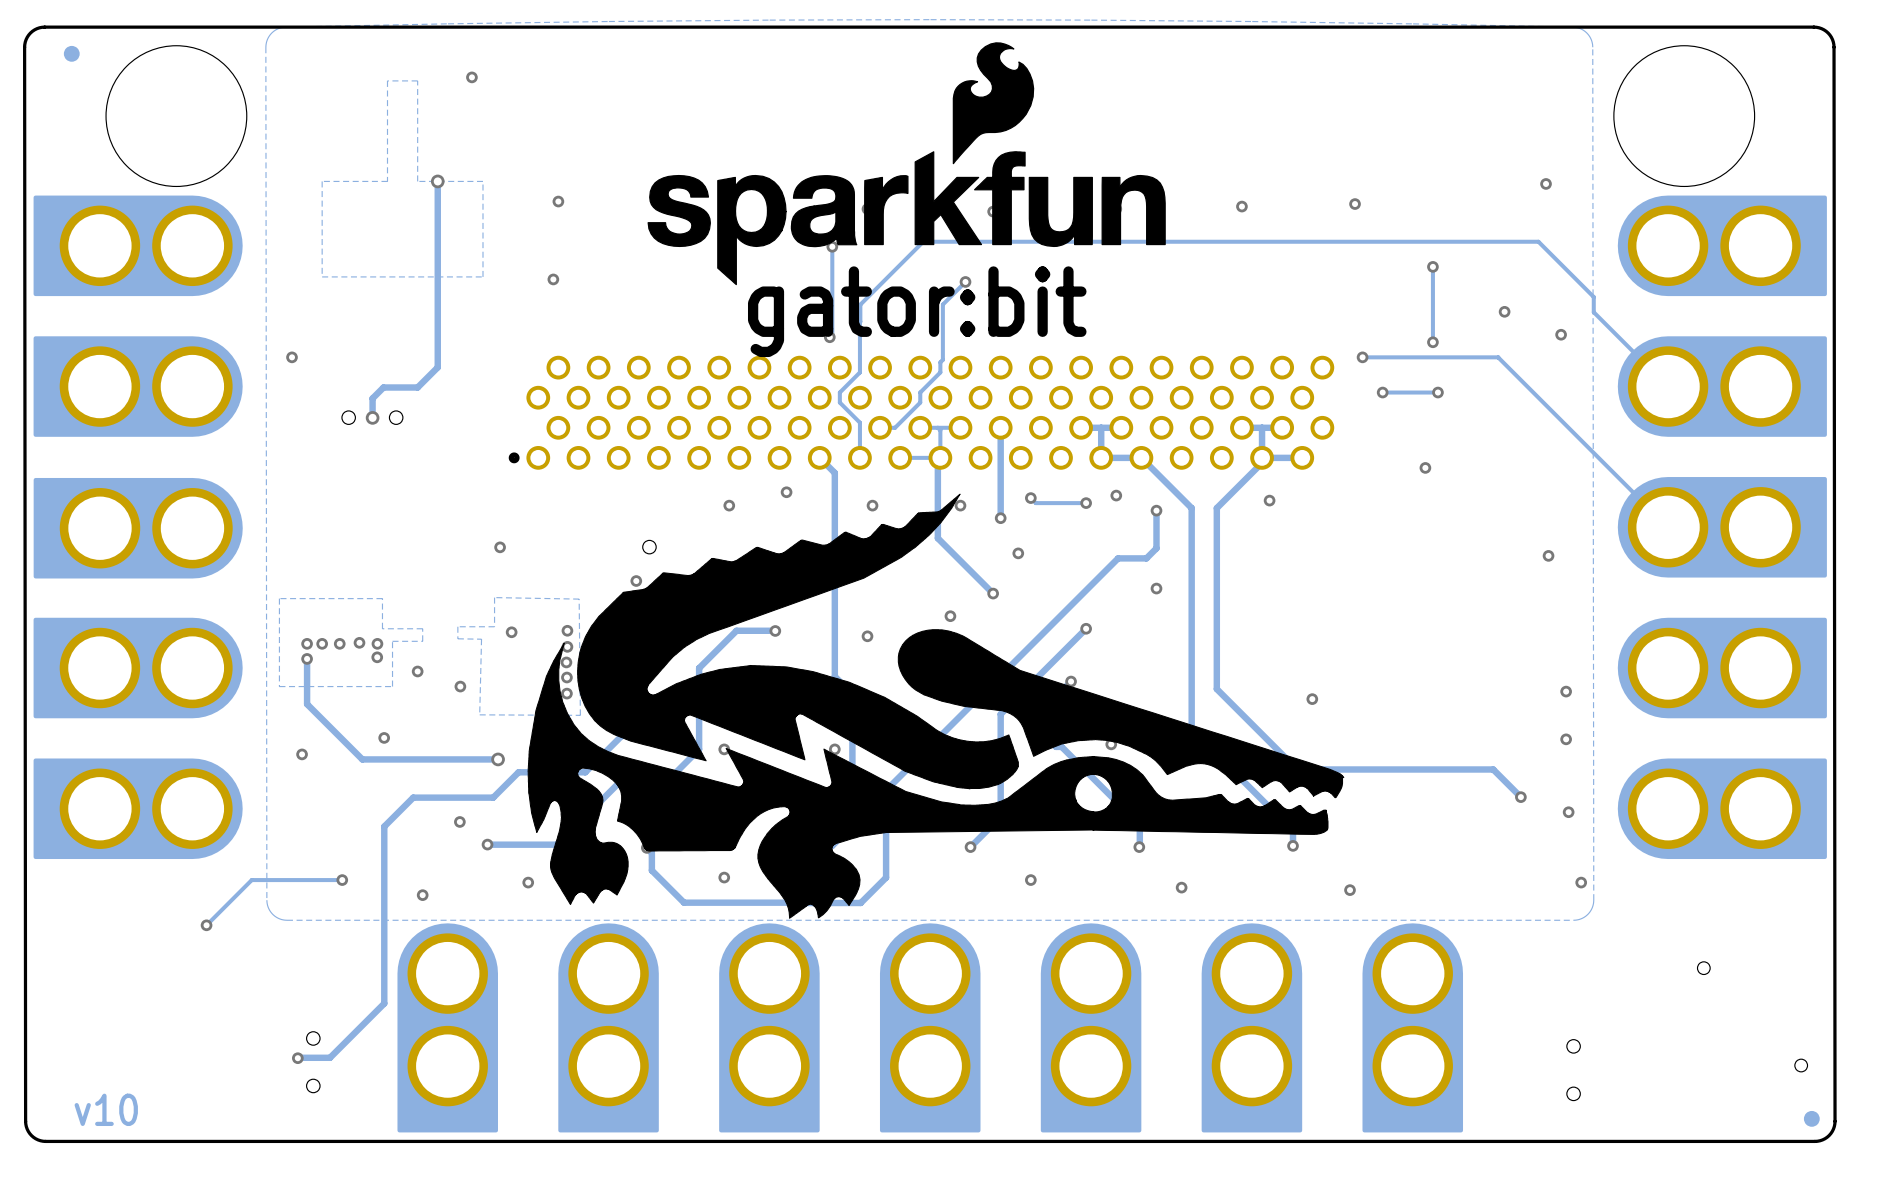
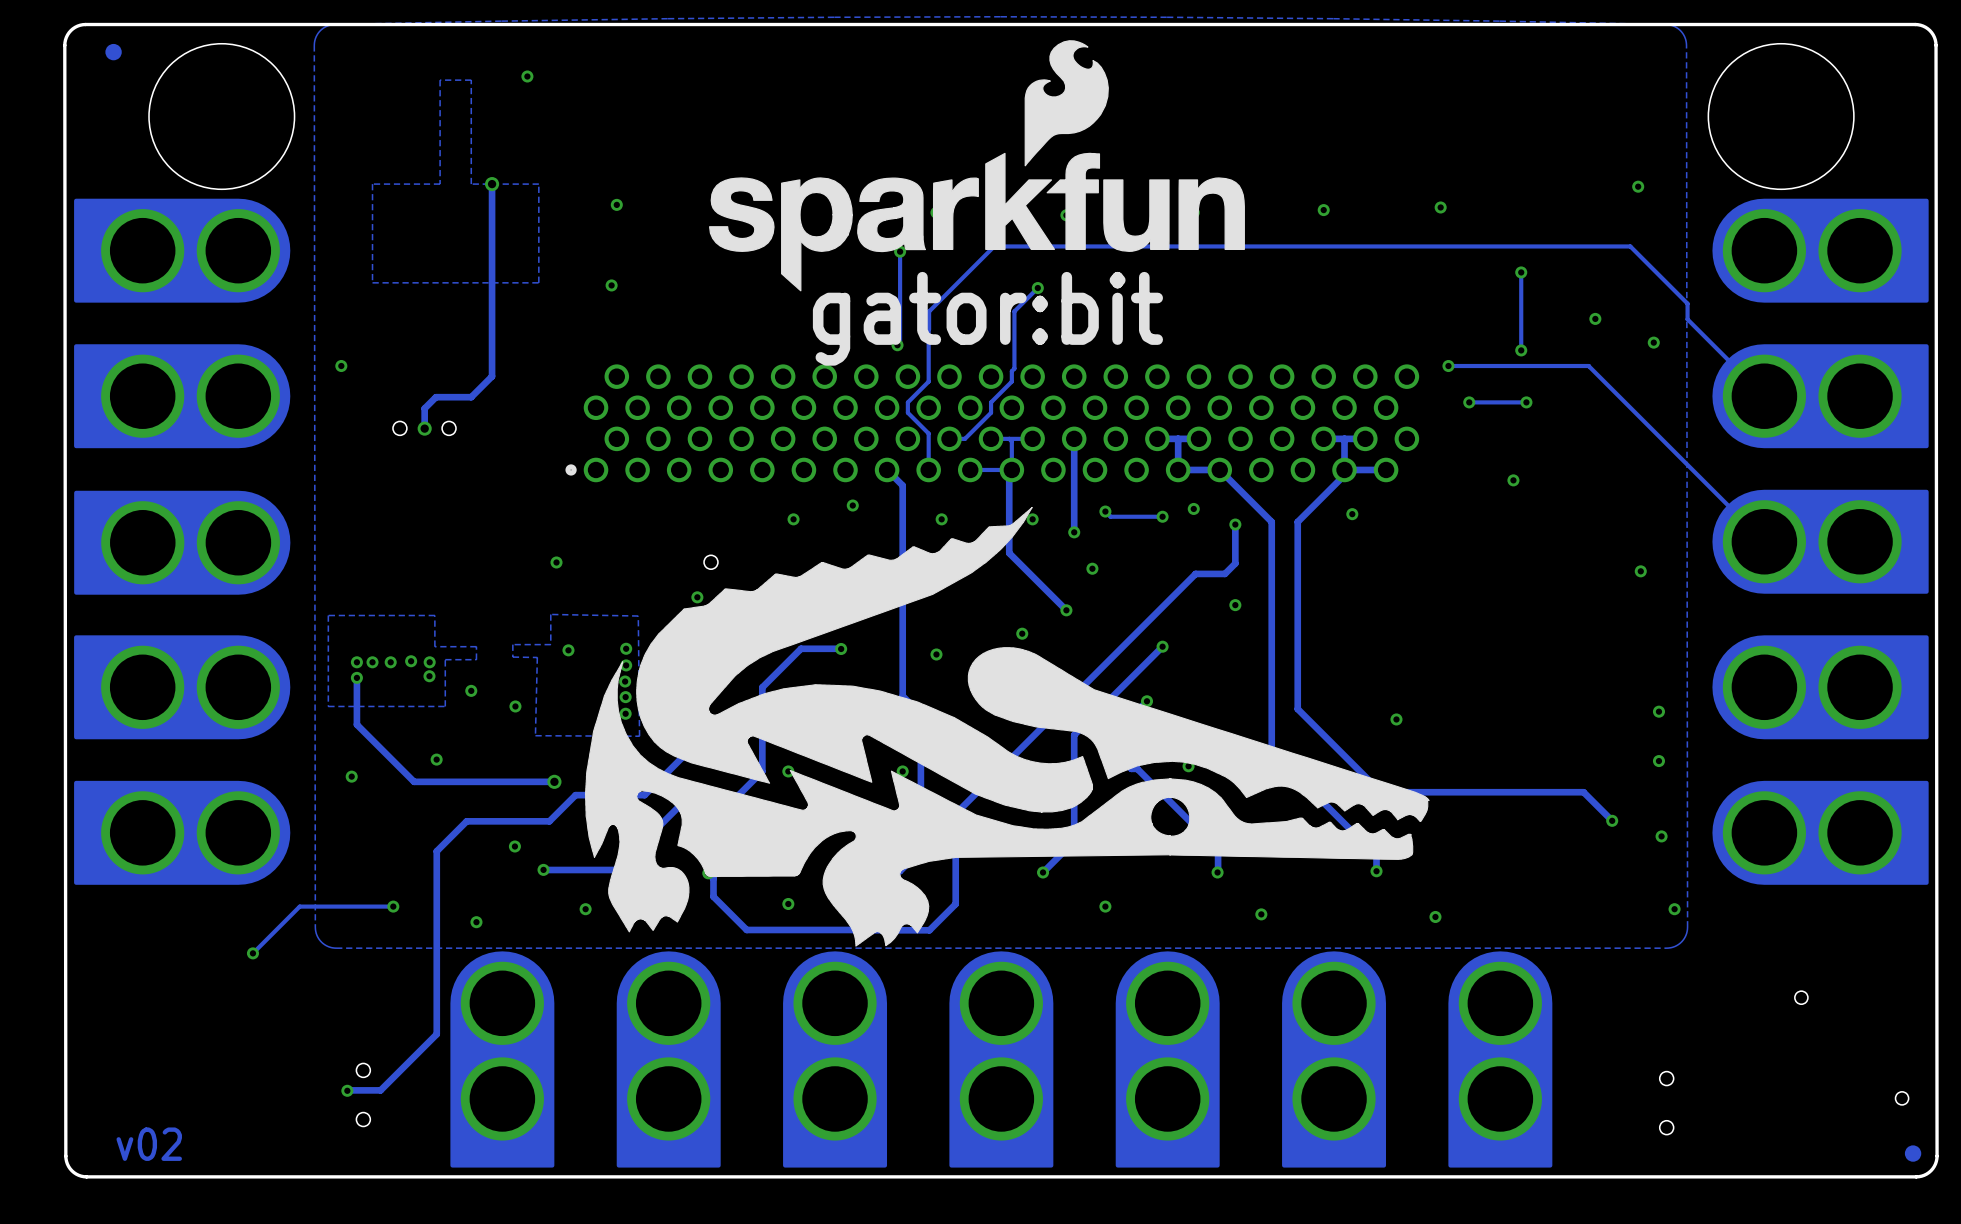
text: v10 (106, 1109) -> v02 (149, 1144)

